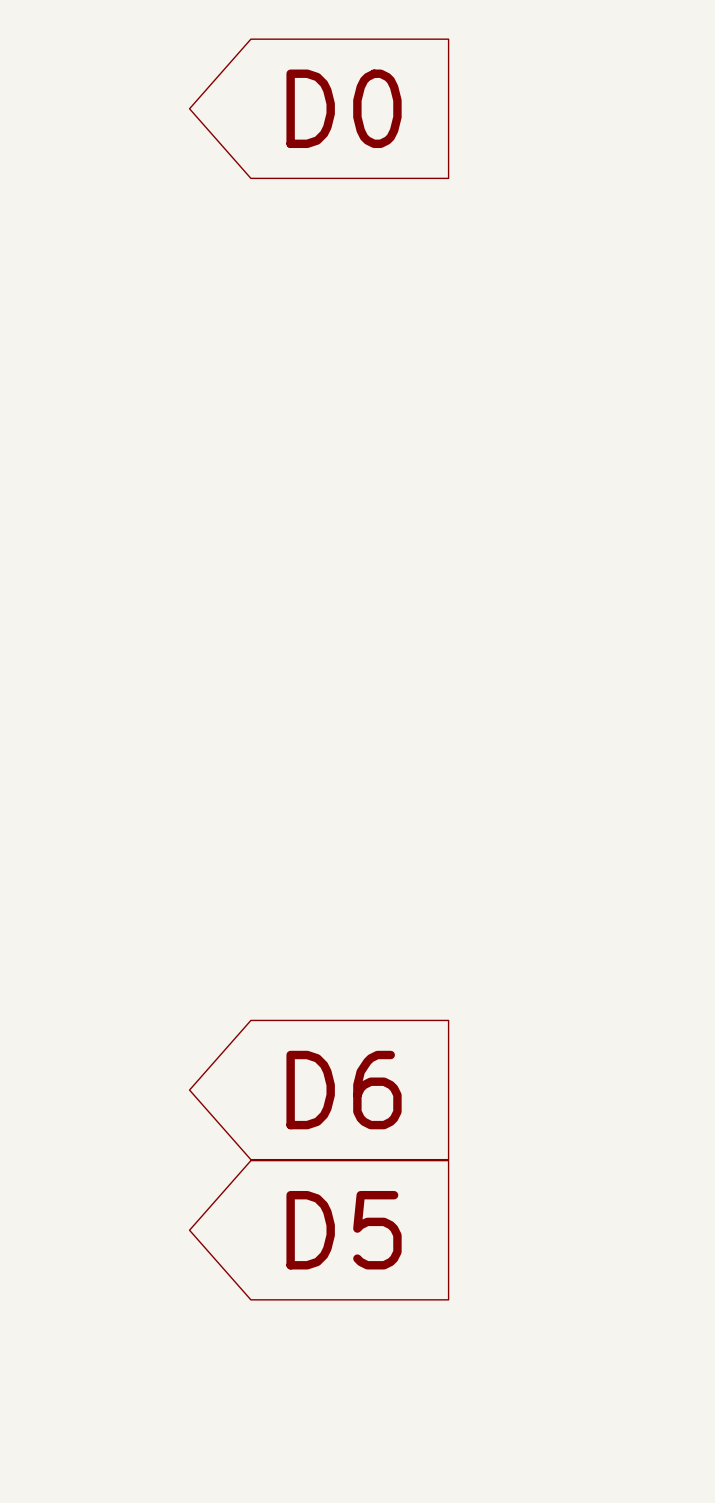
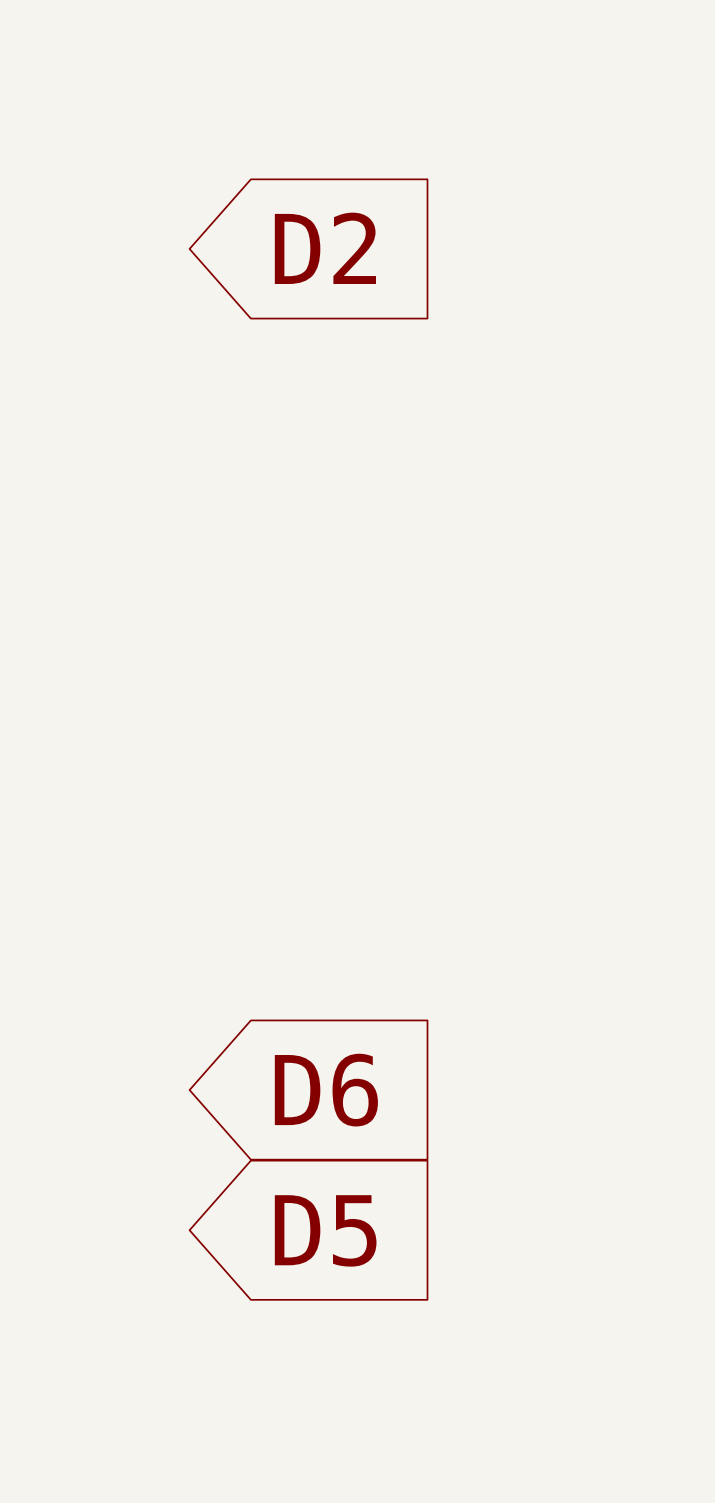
global label: D0 (344, 108) -> none
global label: none -> D2 (325, 248)

